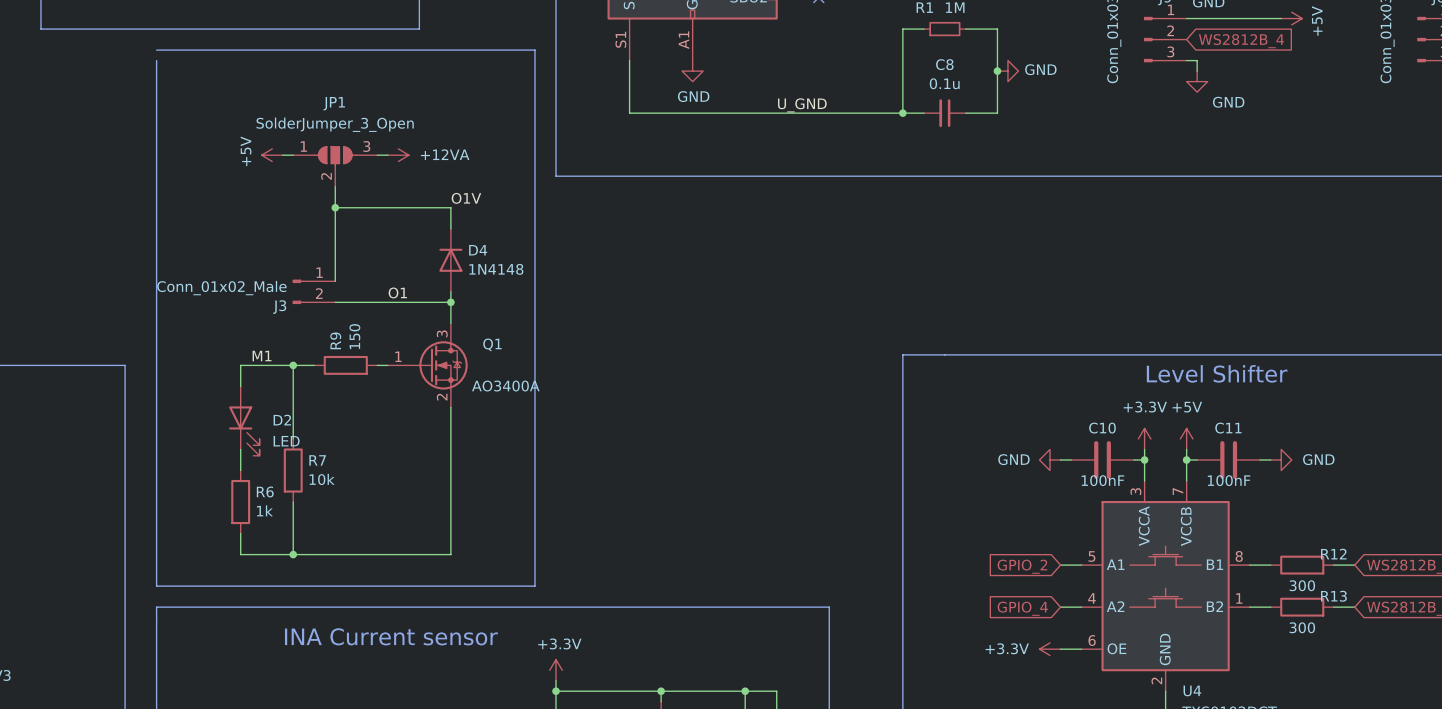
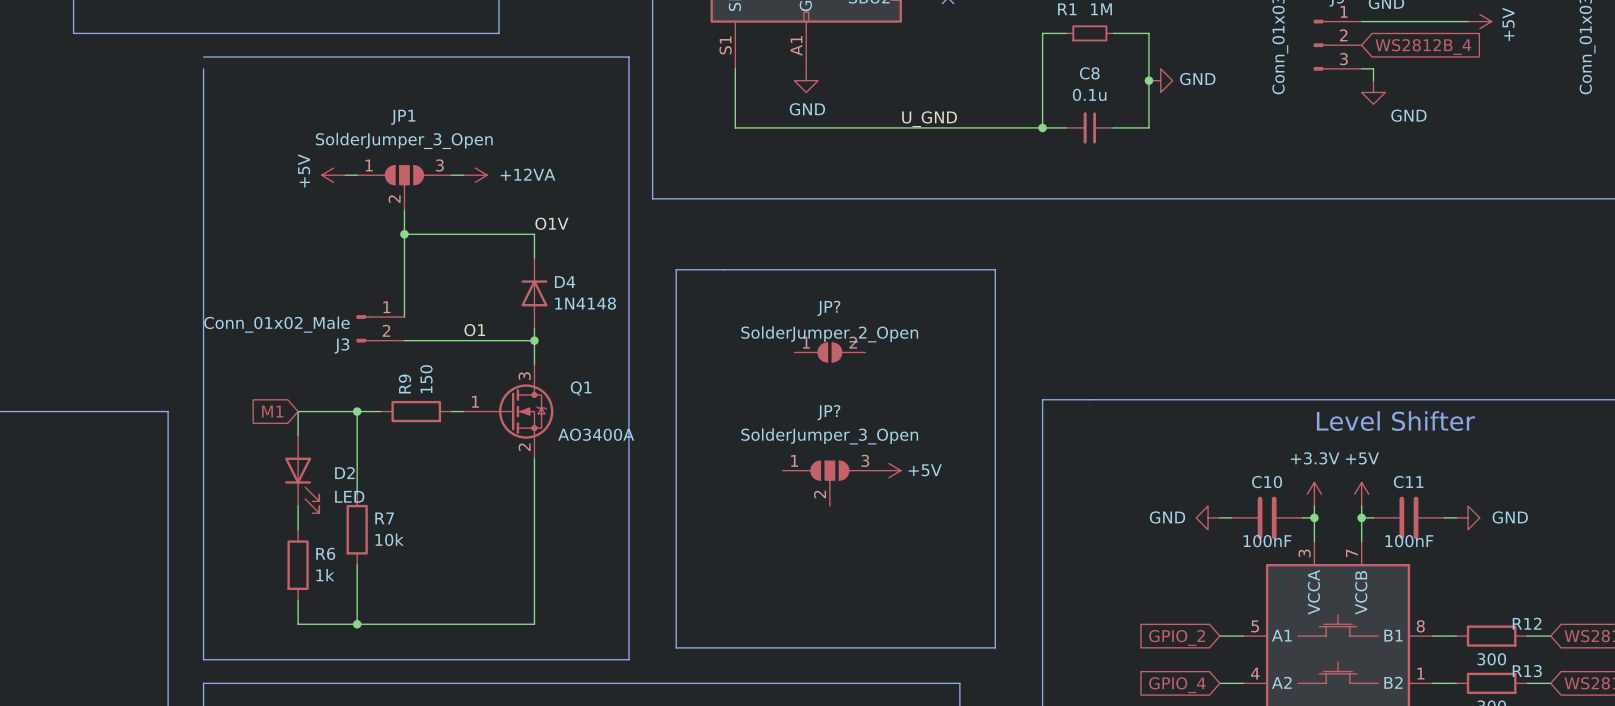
line: none -> (676, 269) (995, 269) (995, 647) (676, 647) (676, 269)
JP?: none -> SolderJumper_2_Open (829, 352)
label: M1 (262, 356) -> none
global label: none -> M1 (272, 411)
power symbol: none -> +5V (888, 470)
JP?: none -> SolderJumper_3_Open (829, 483)

